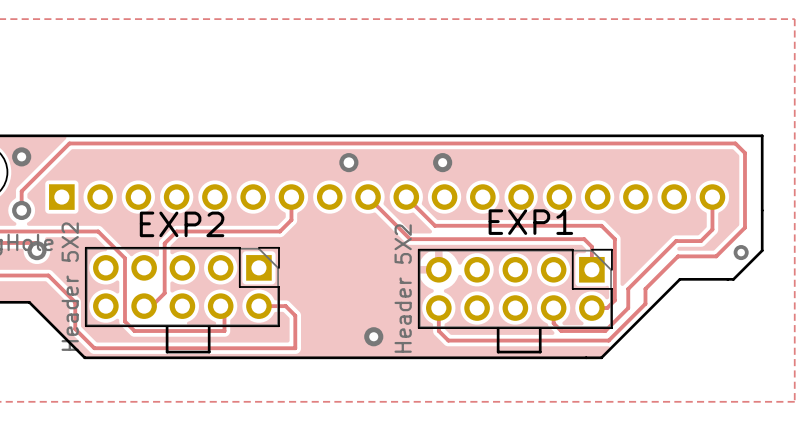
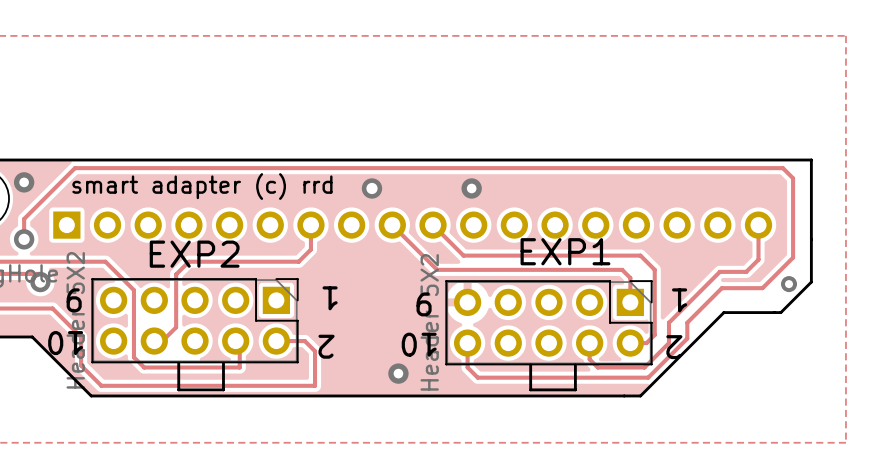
text: none -> smart adapter (c) rrd (202, 186)
text: none -> 1 (330, 298)
text: none -> 9 (74, 300)
text: none -> 1 (679, 300)
text: none -> 9 (424, 304)
text: none -> 10 (65, 343)
text: none -> 10 (419, 344)
text: none -> 2 (326, 346)
text: none -> 2 (674, 347)

